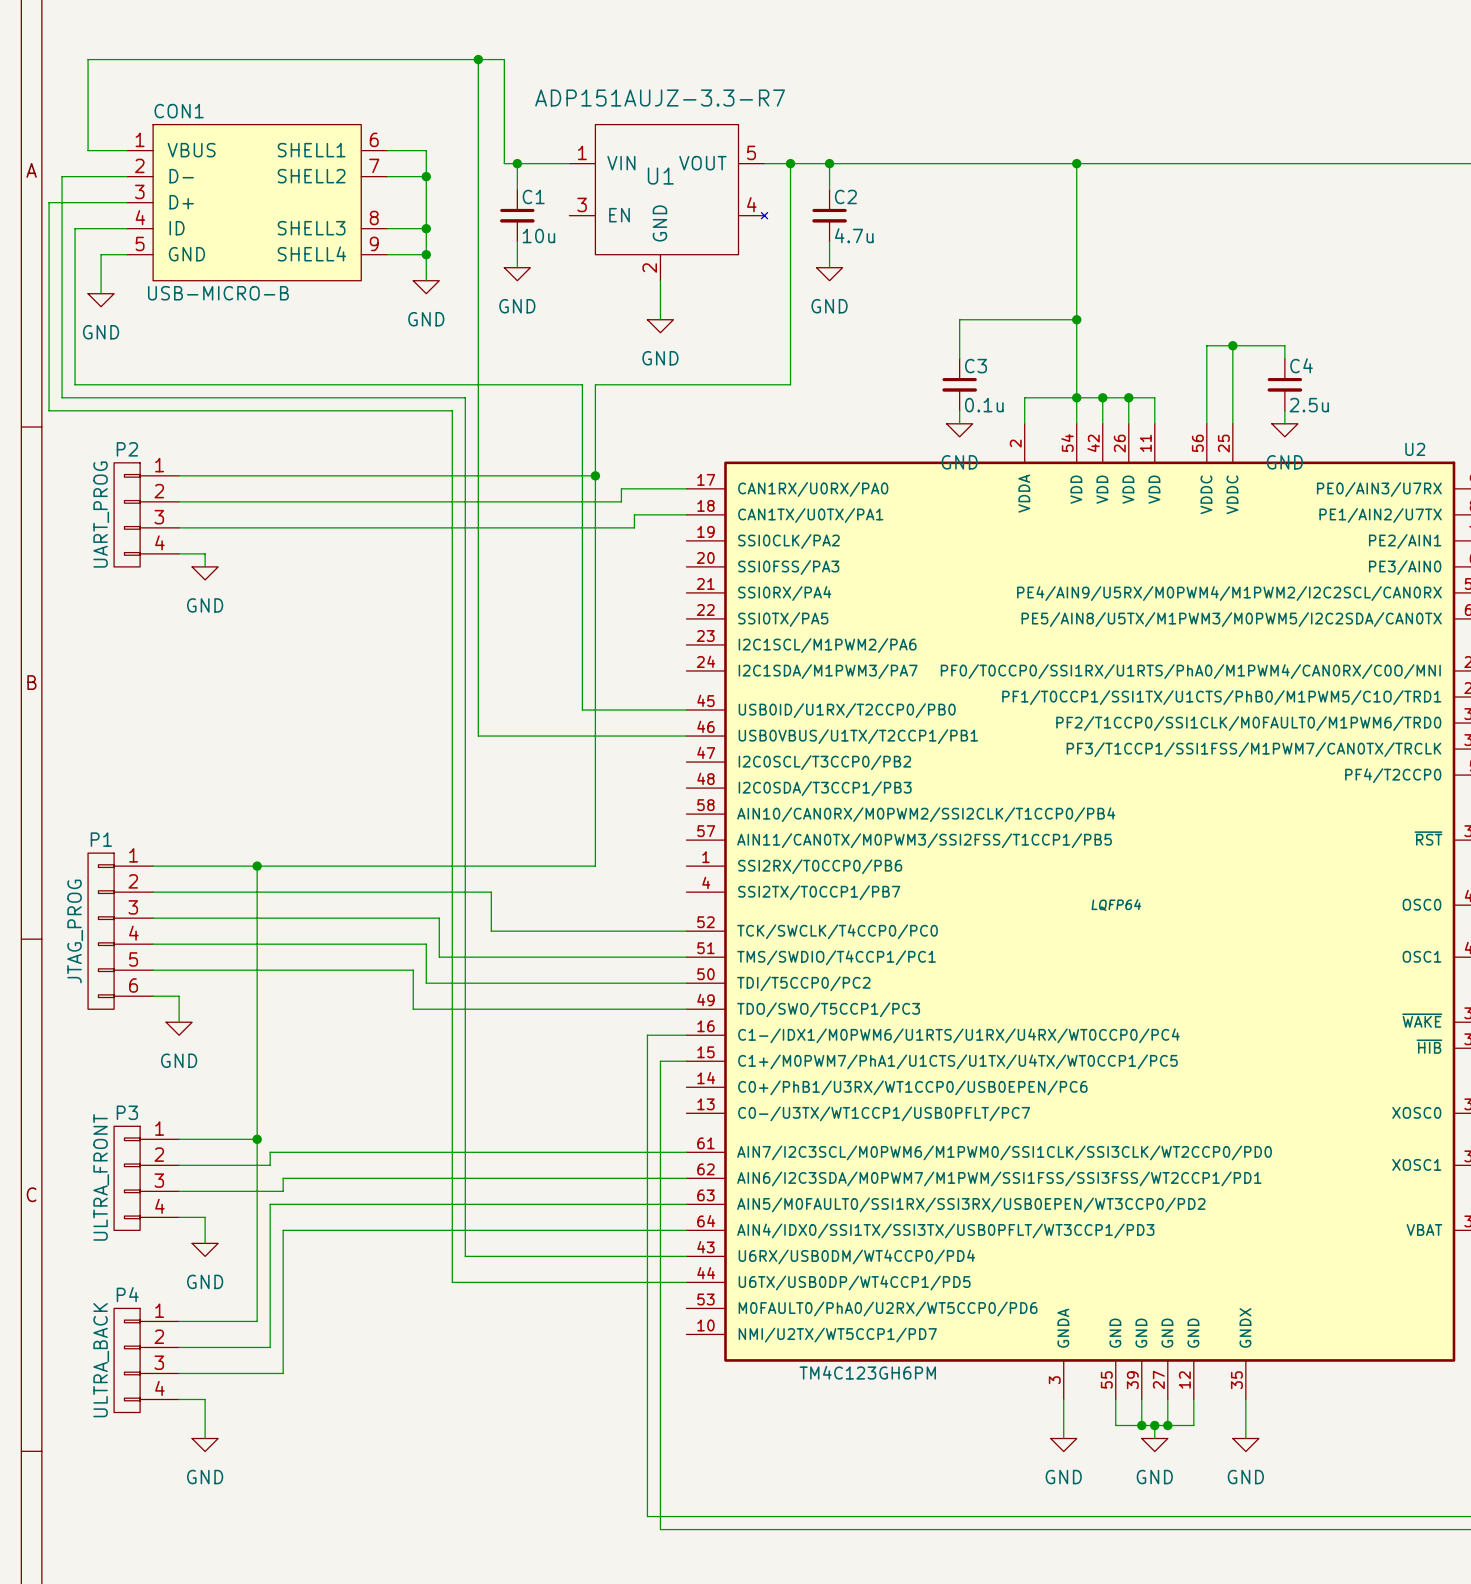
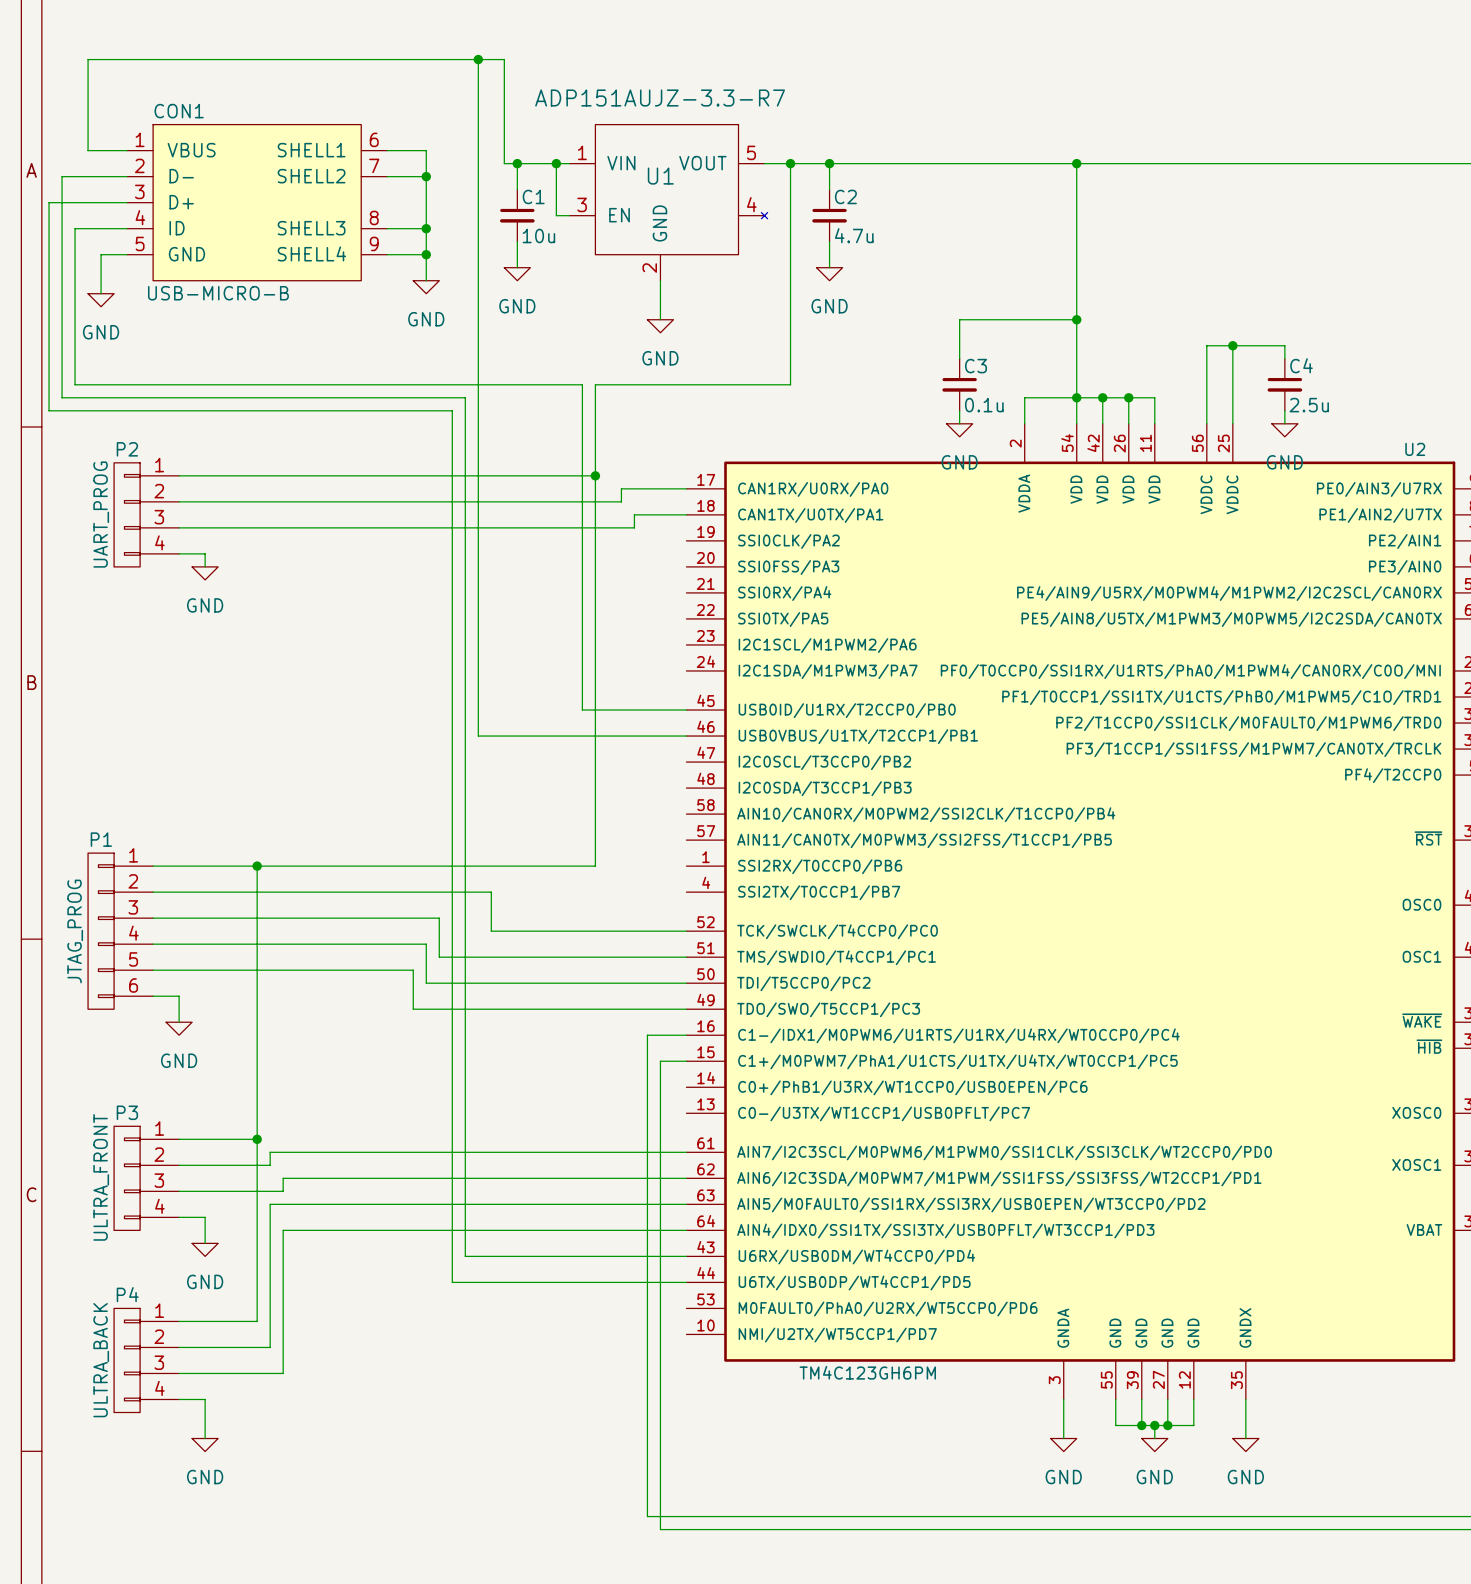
wire: none -> (556, 163) (556, 215) (569, 215)
junction: none -> (556, 163)
U2 text: LQFP64 (1116, 905) -> none

